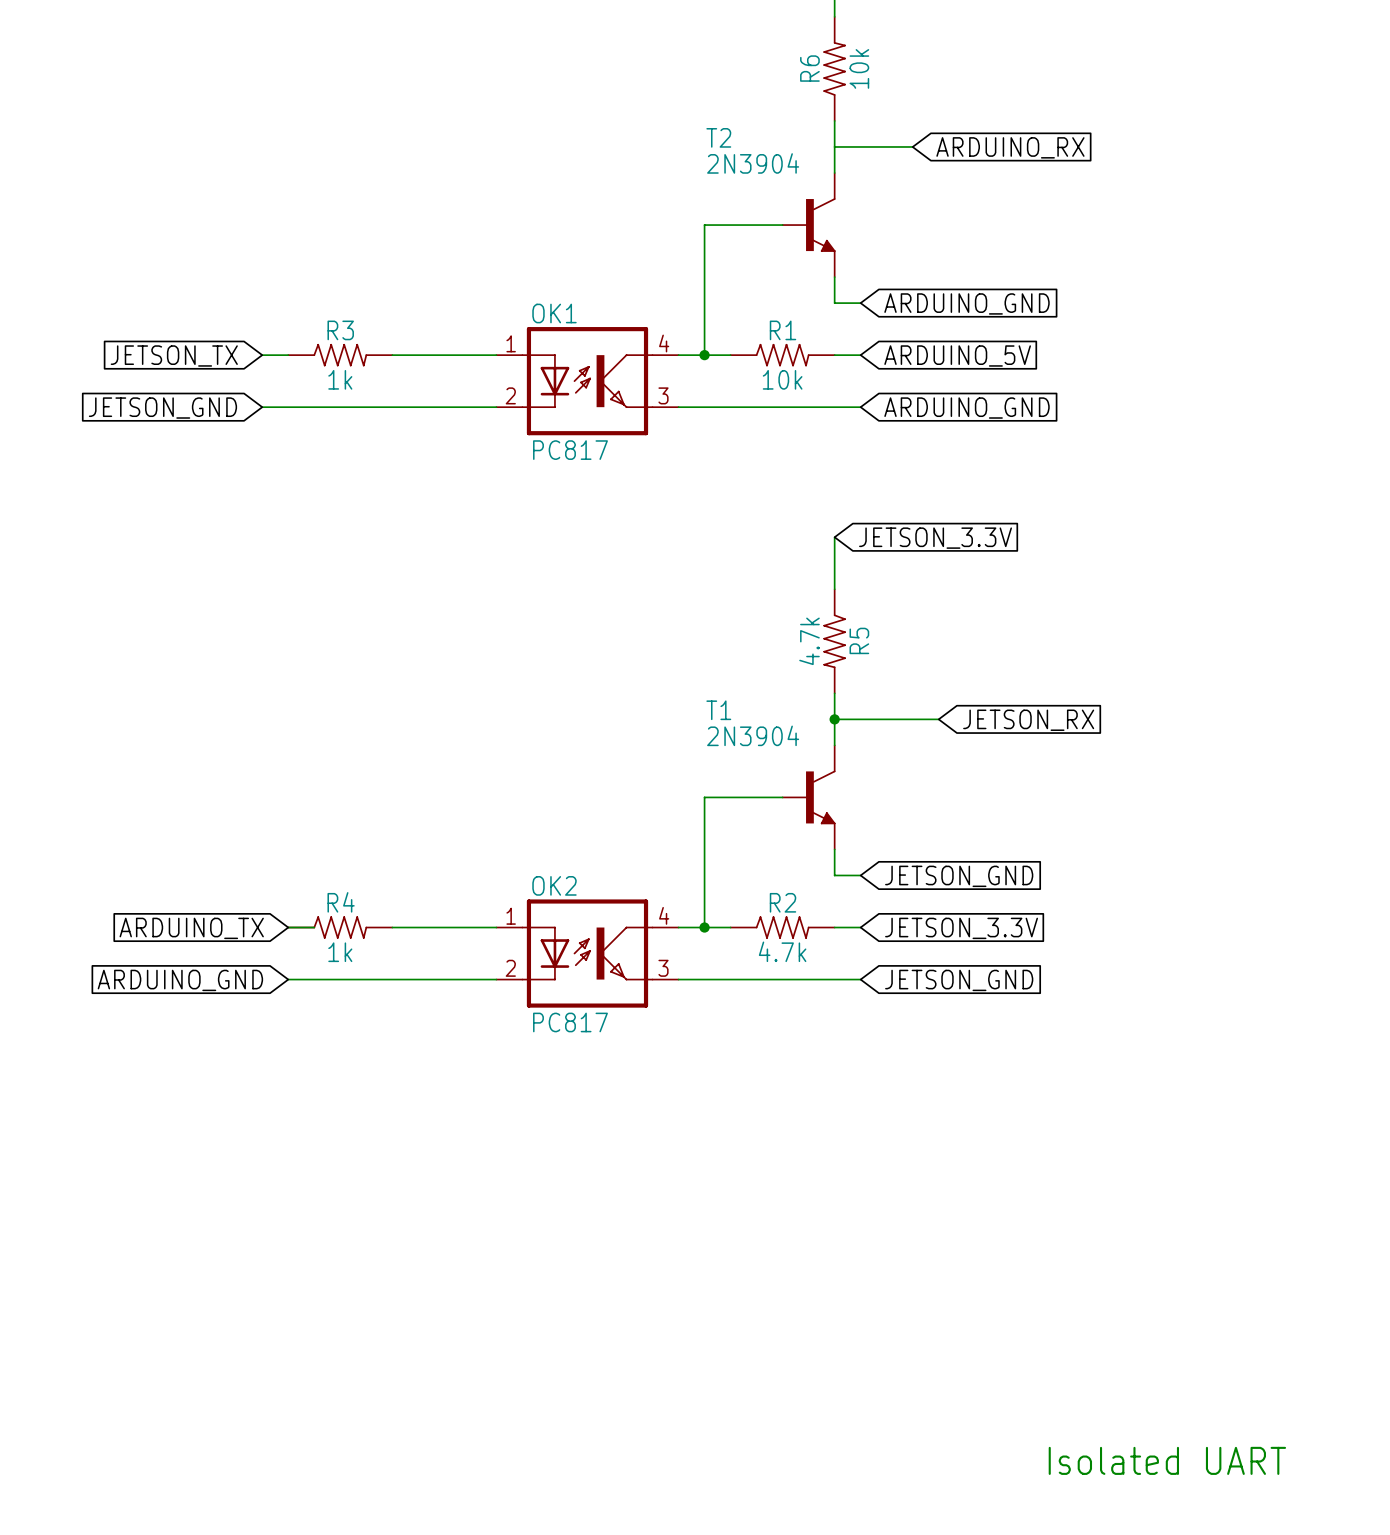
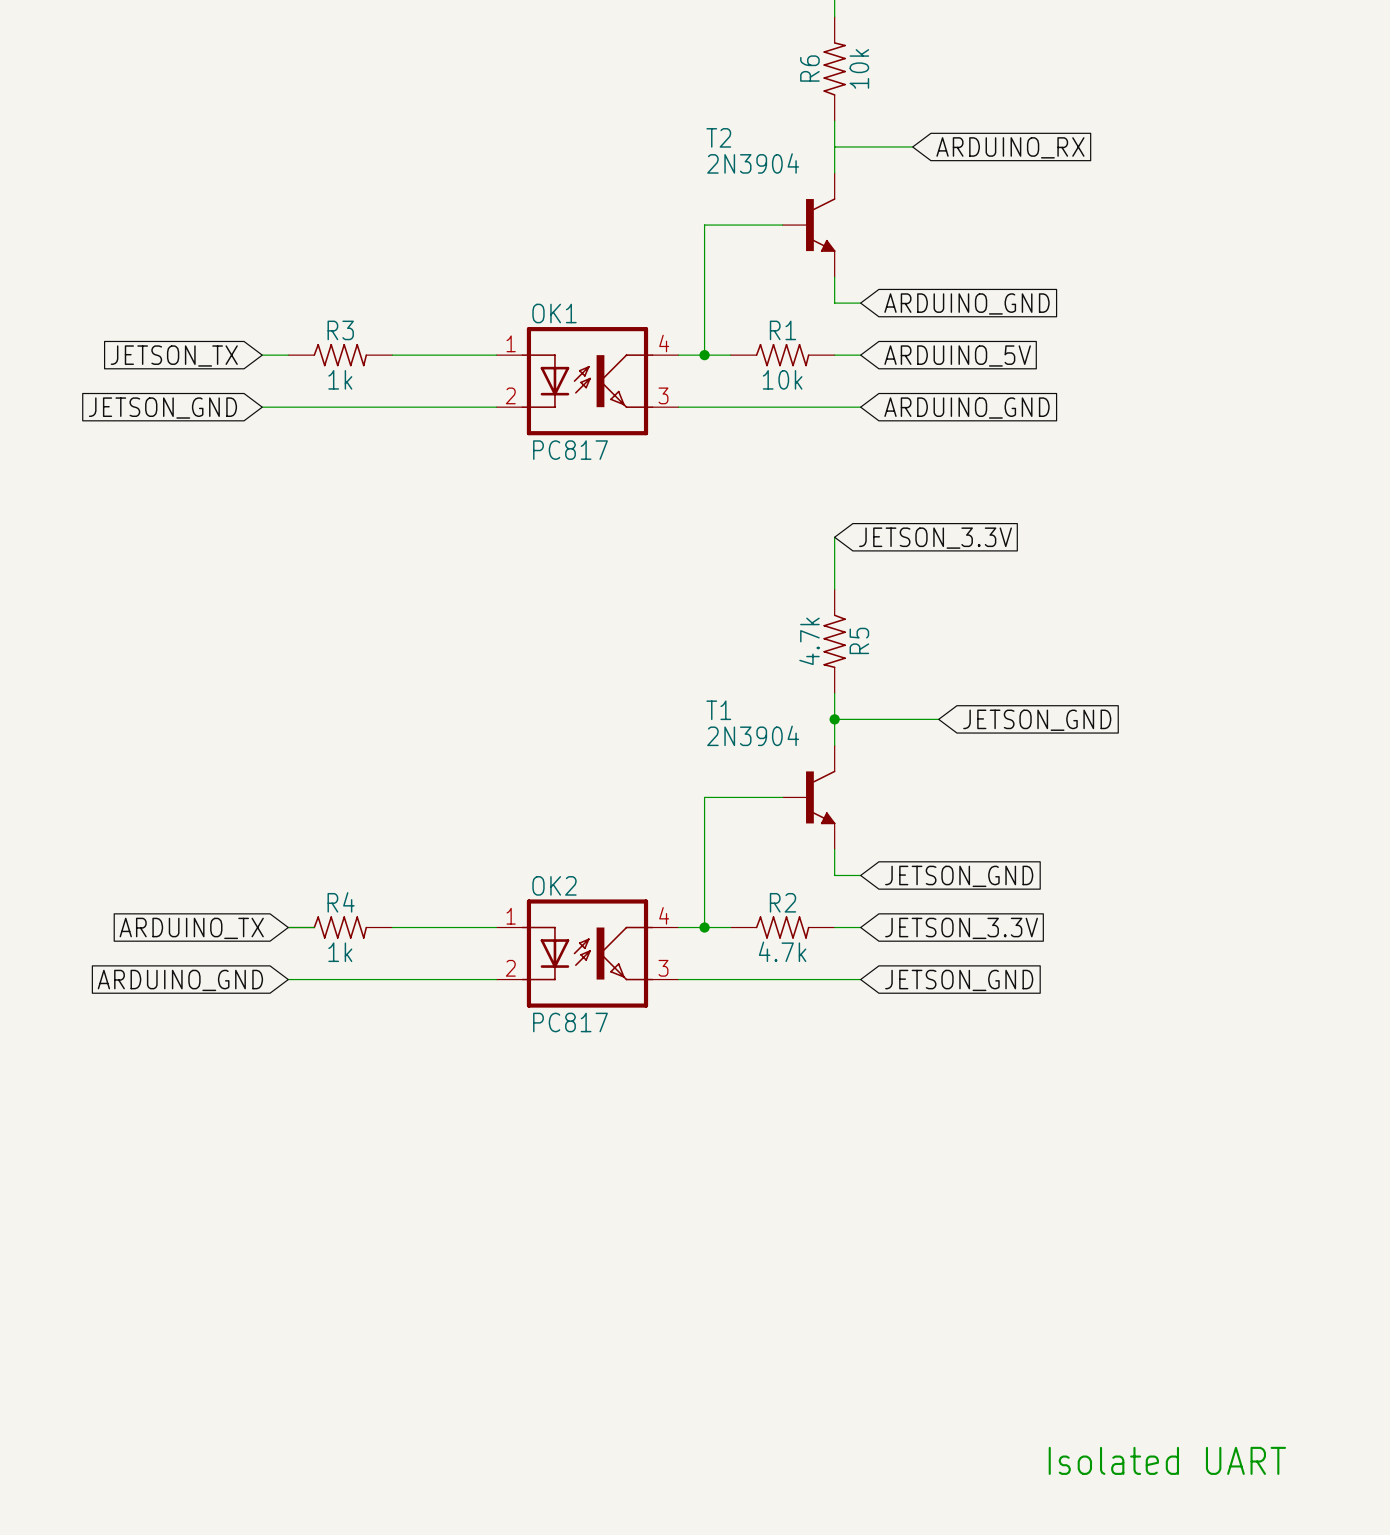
global label: JETSON_RX (1028, 720) -> JETSON_GND (1037, 720)

